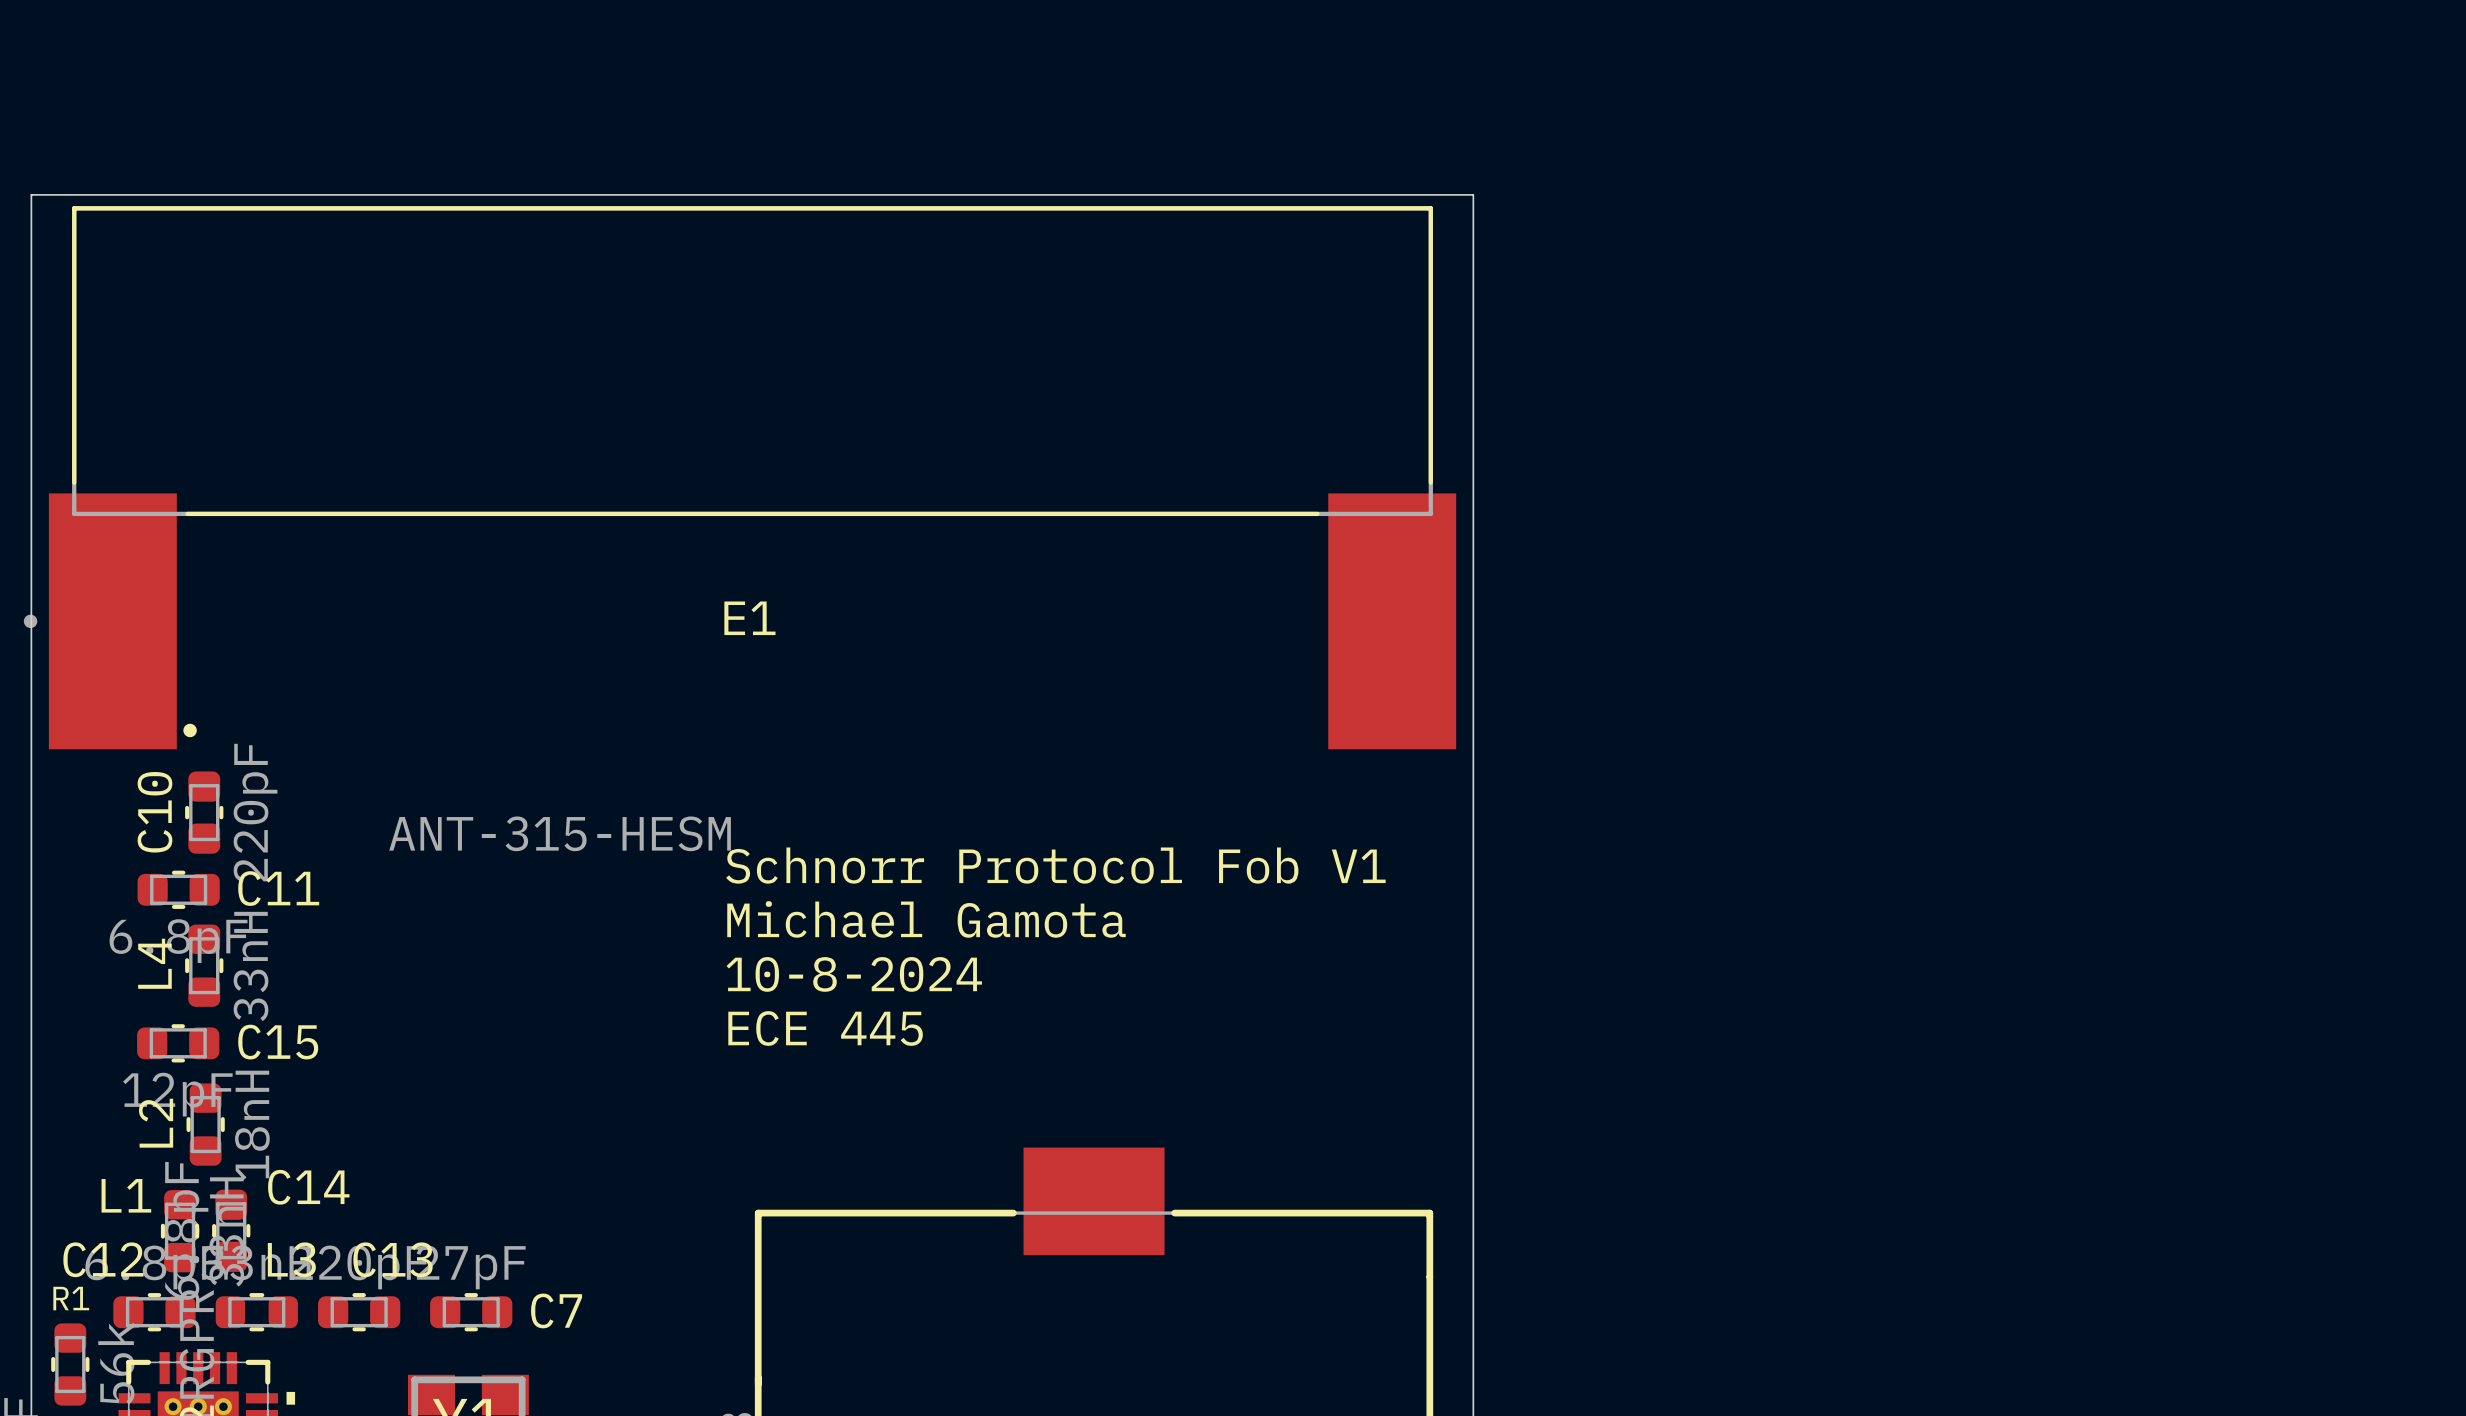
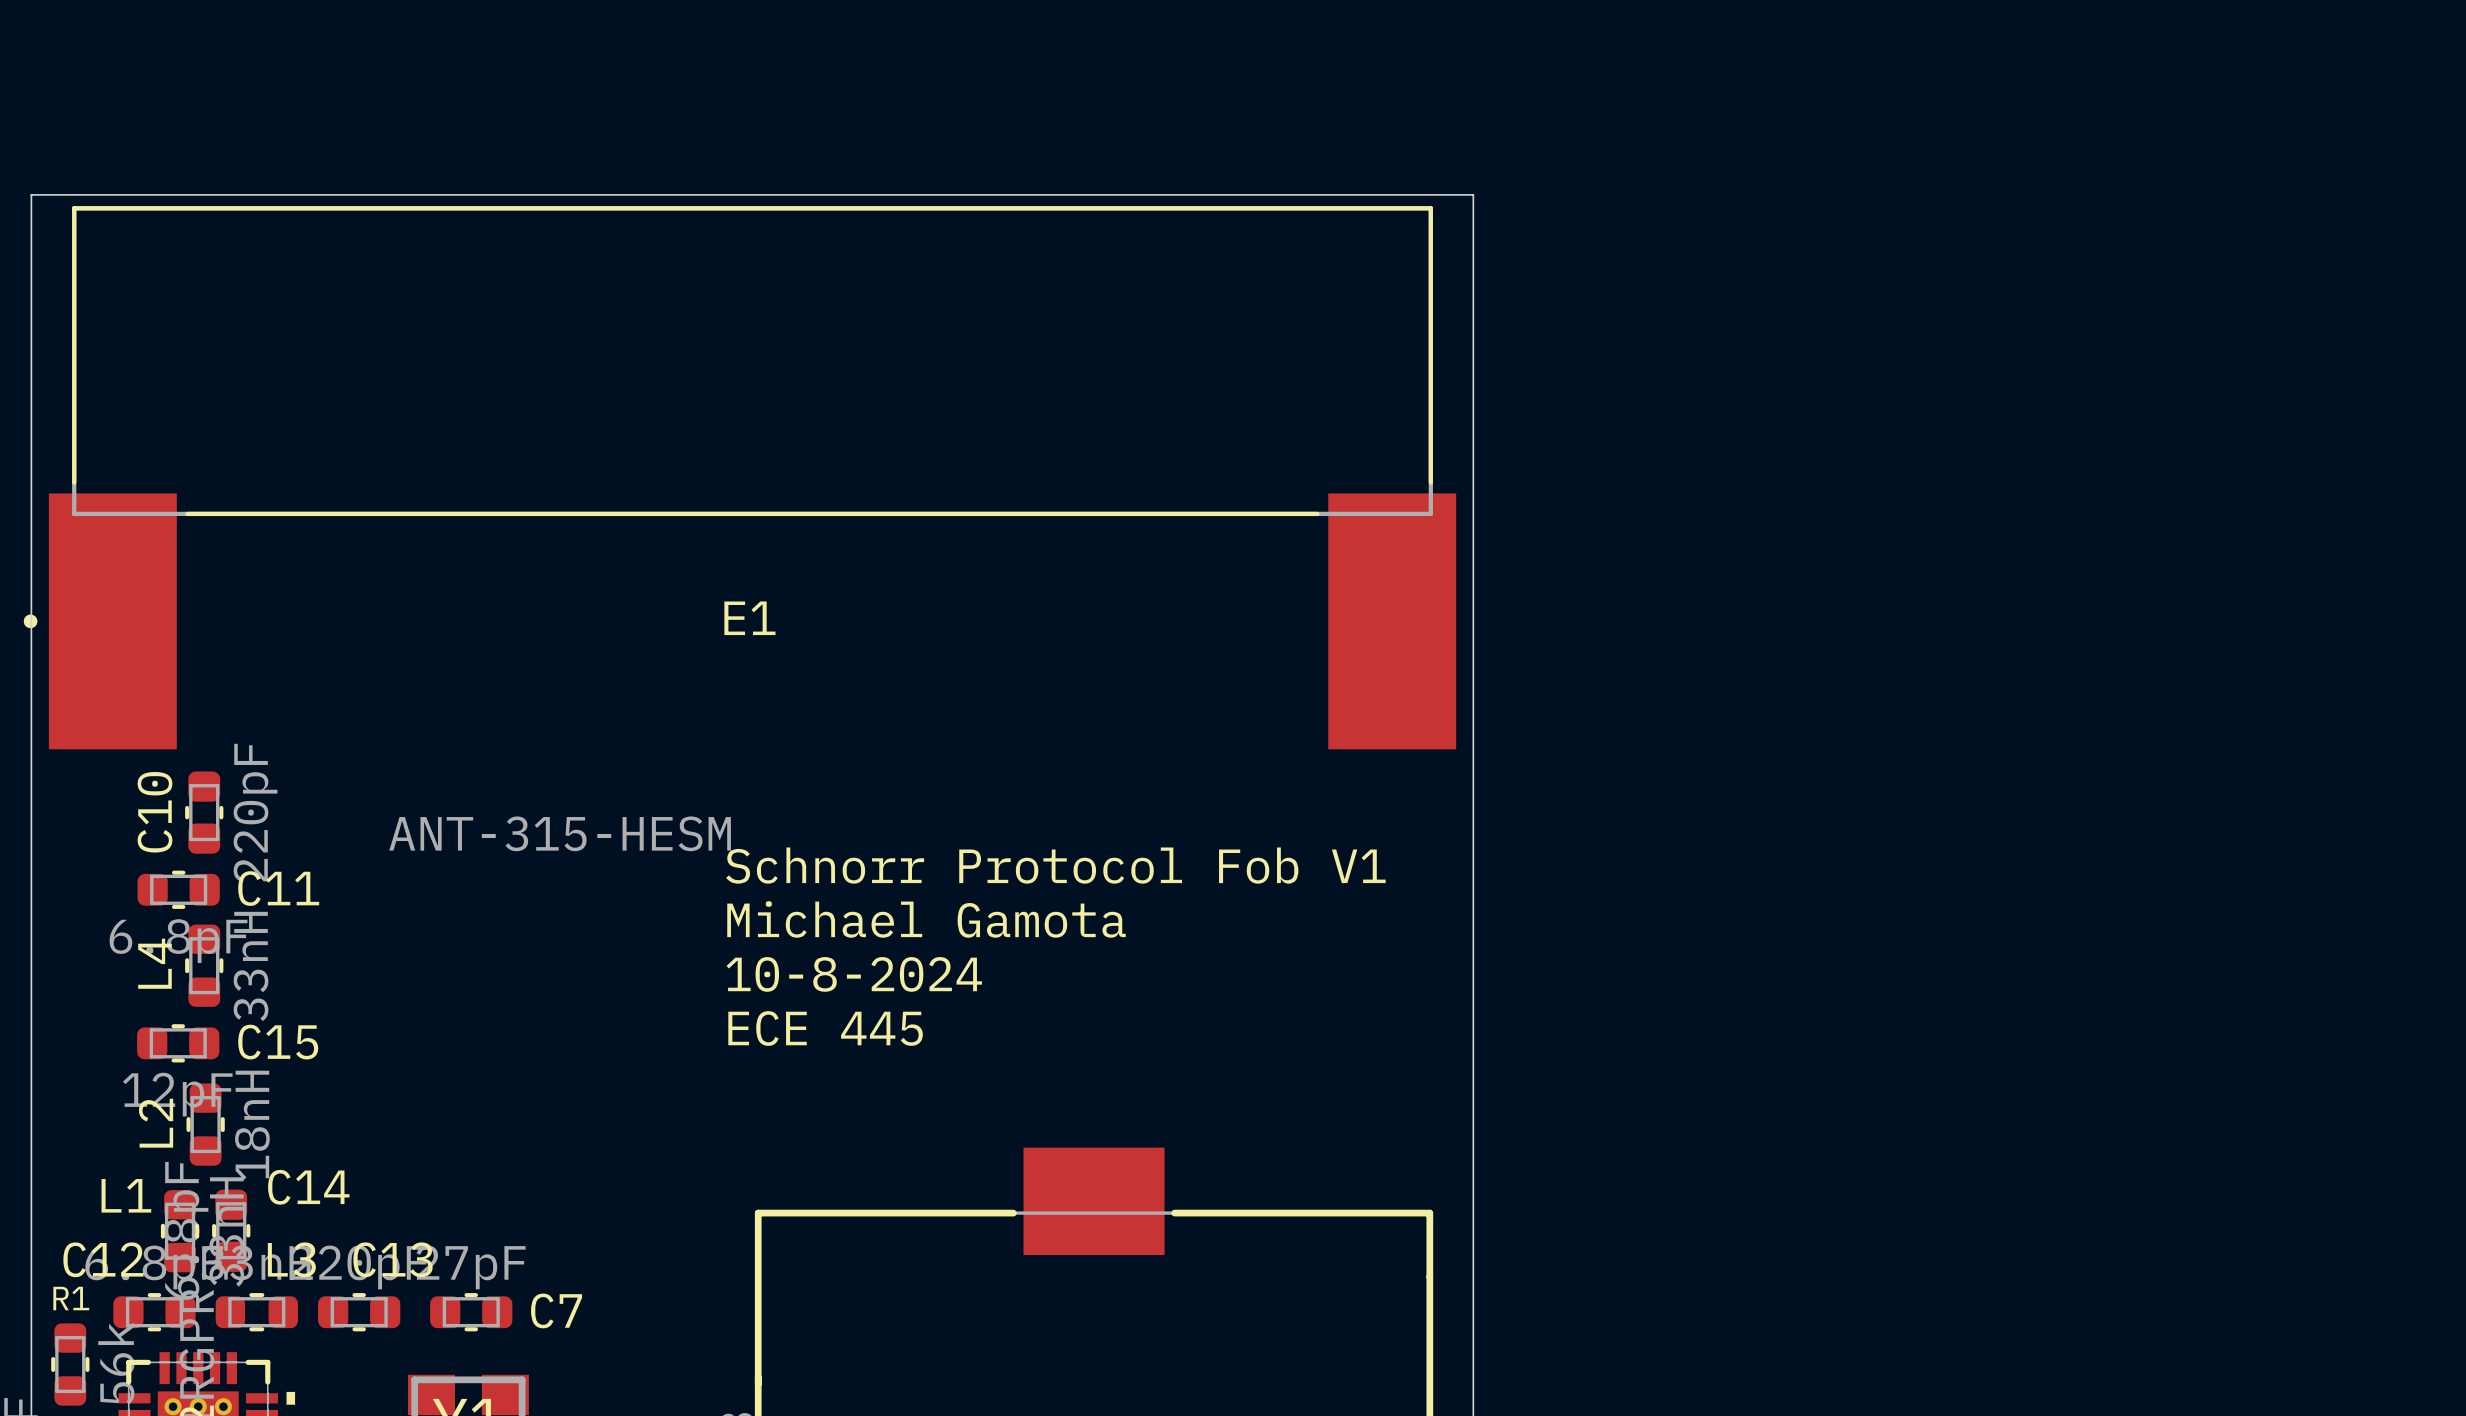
E1 footprint: [23, 206, 1457, 750] -> [23, 206, 1457, 750]

